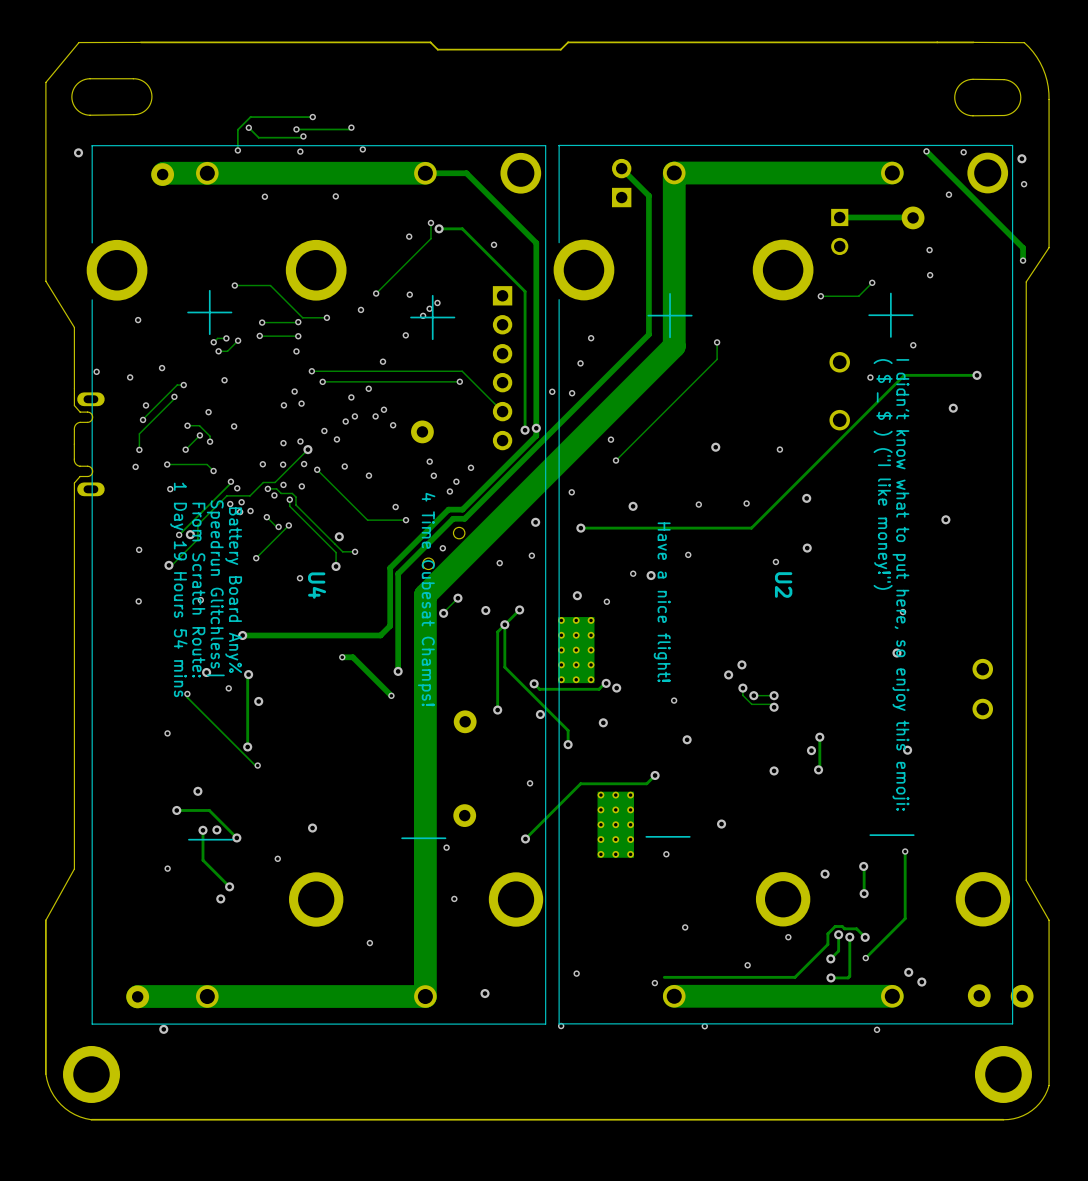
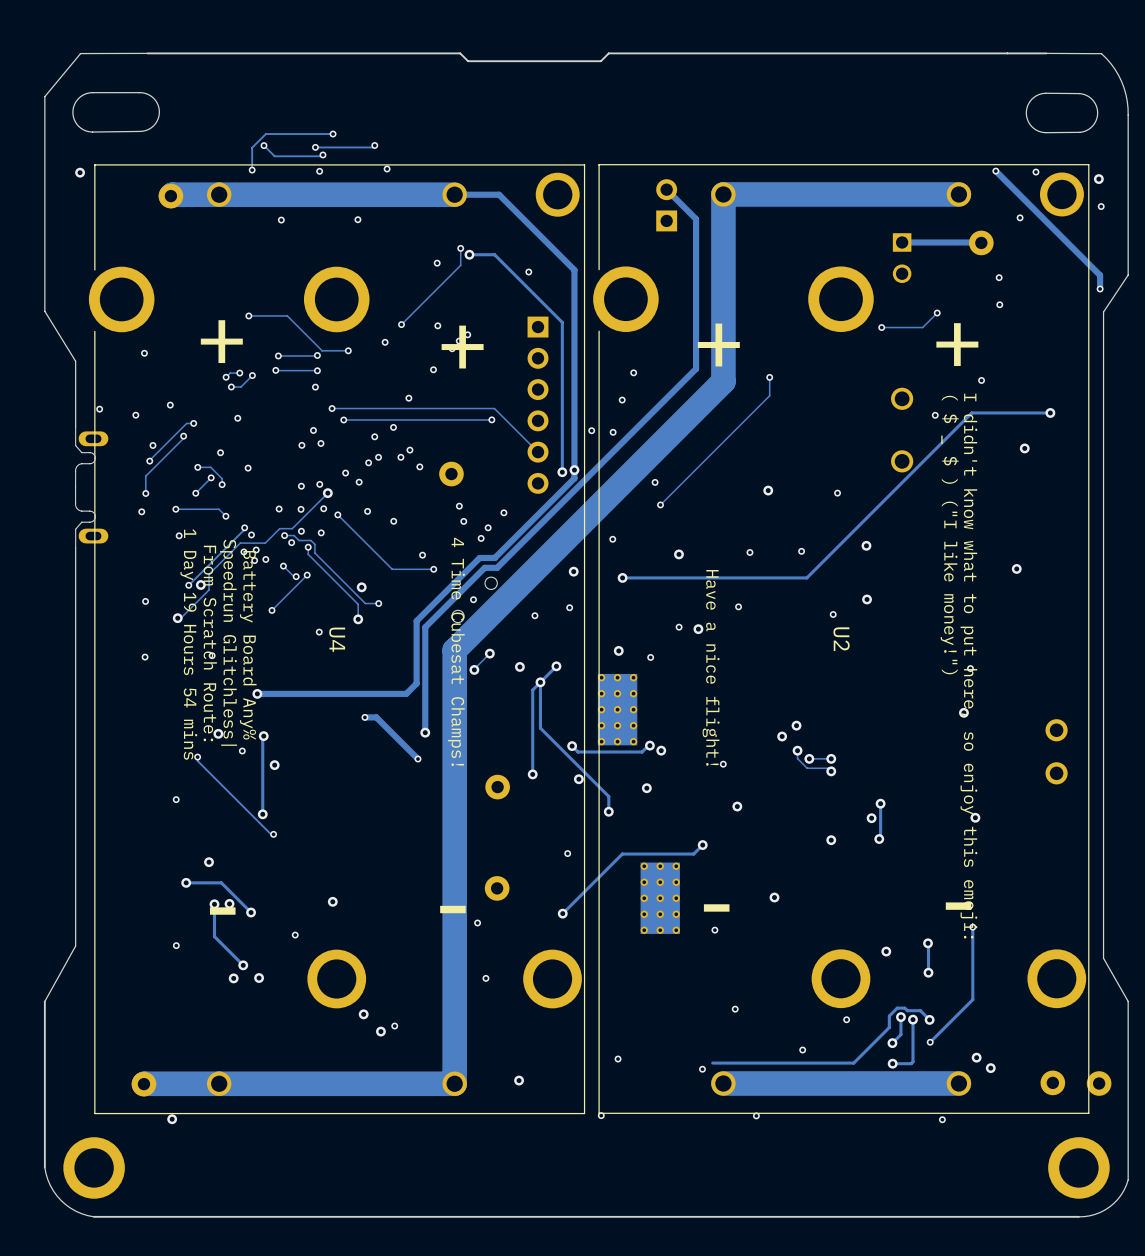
via: none -> (259, 978)
via: none -> (363, 1014)
via: none -> (380, 1031)

